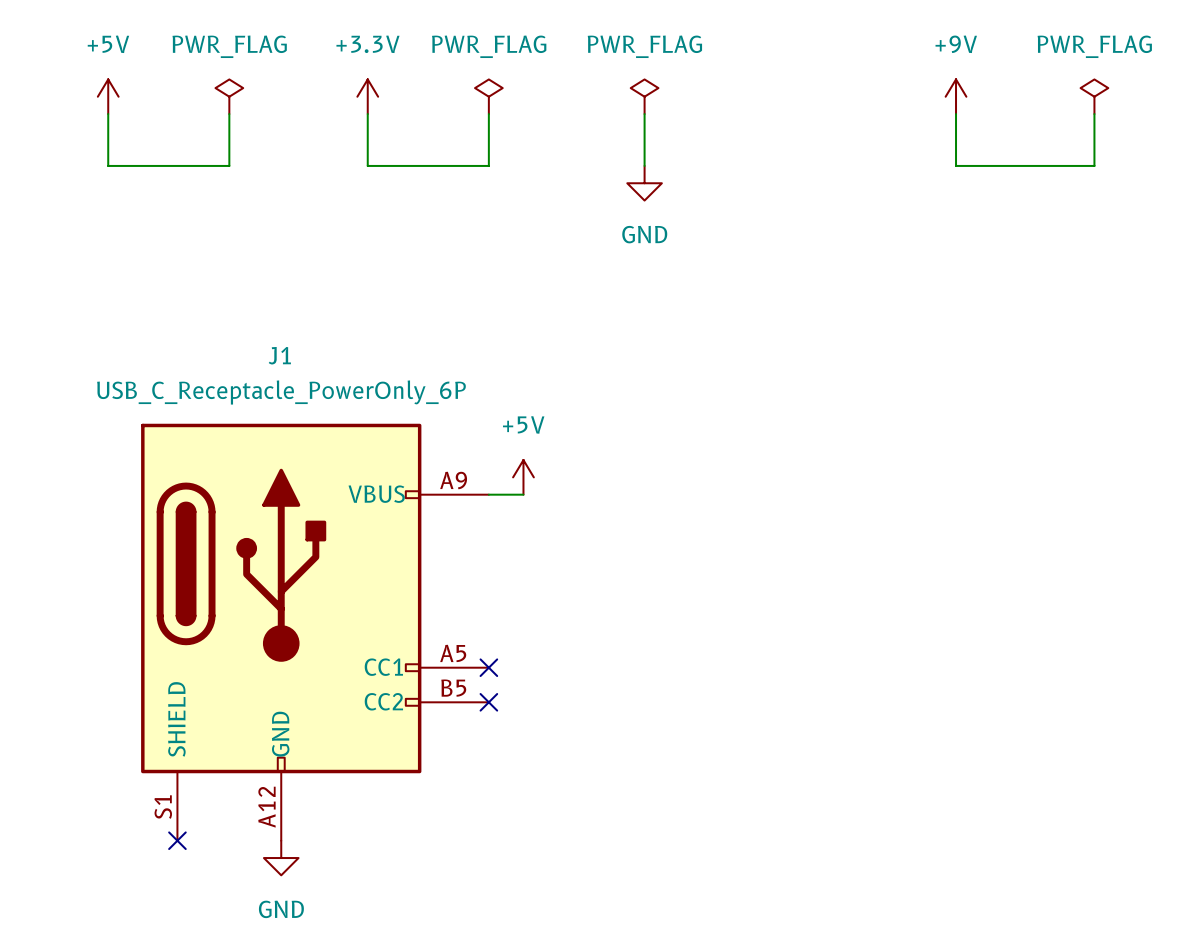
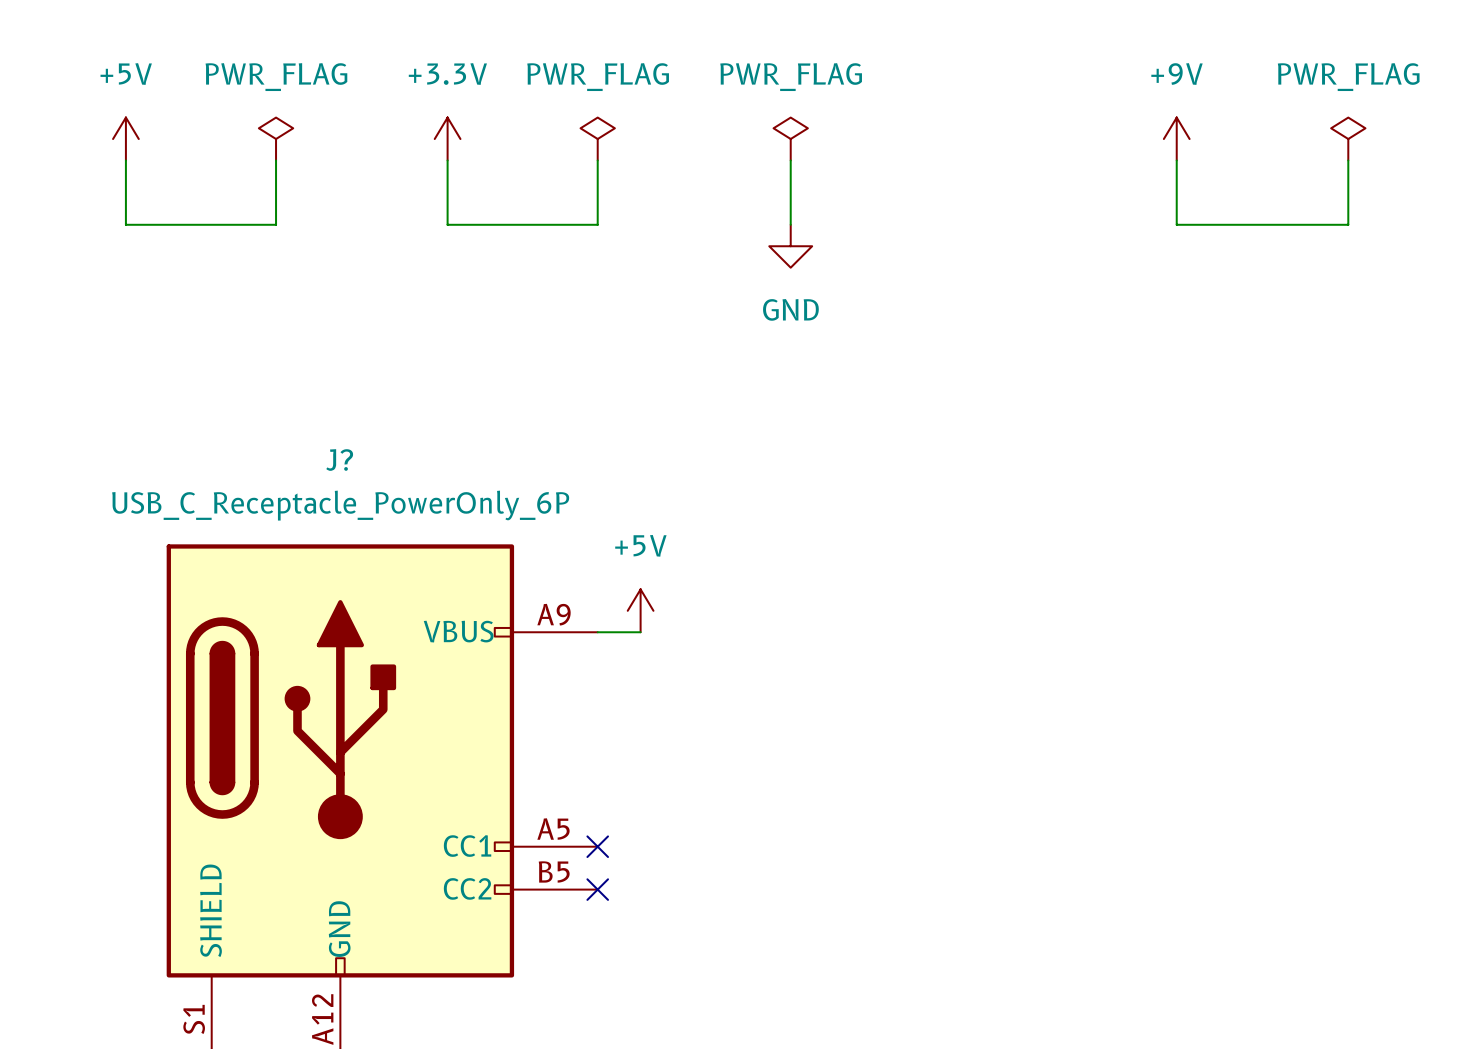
J1 name: J1 (279, 355) -> J? (339, 460)

